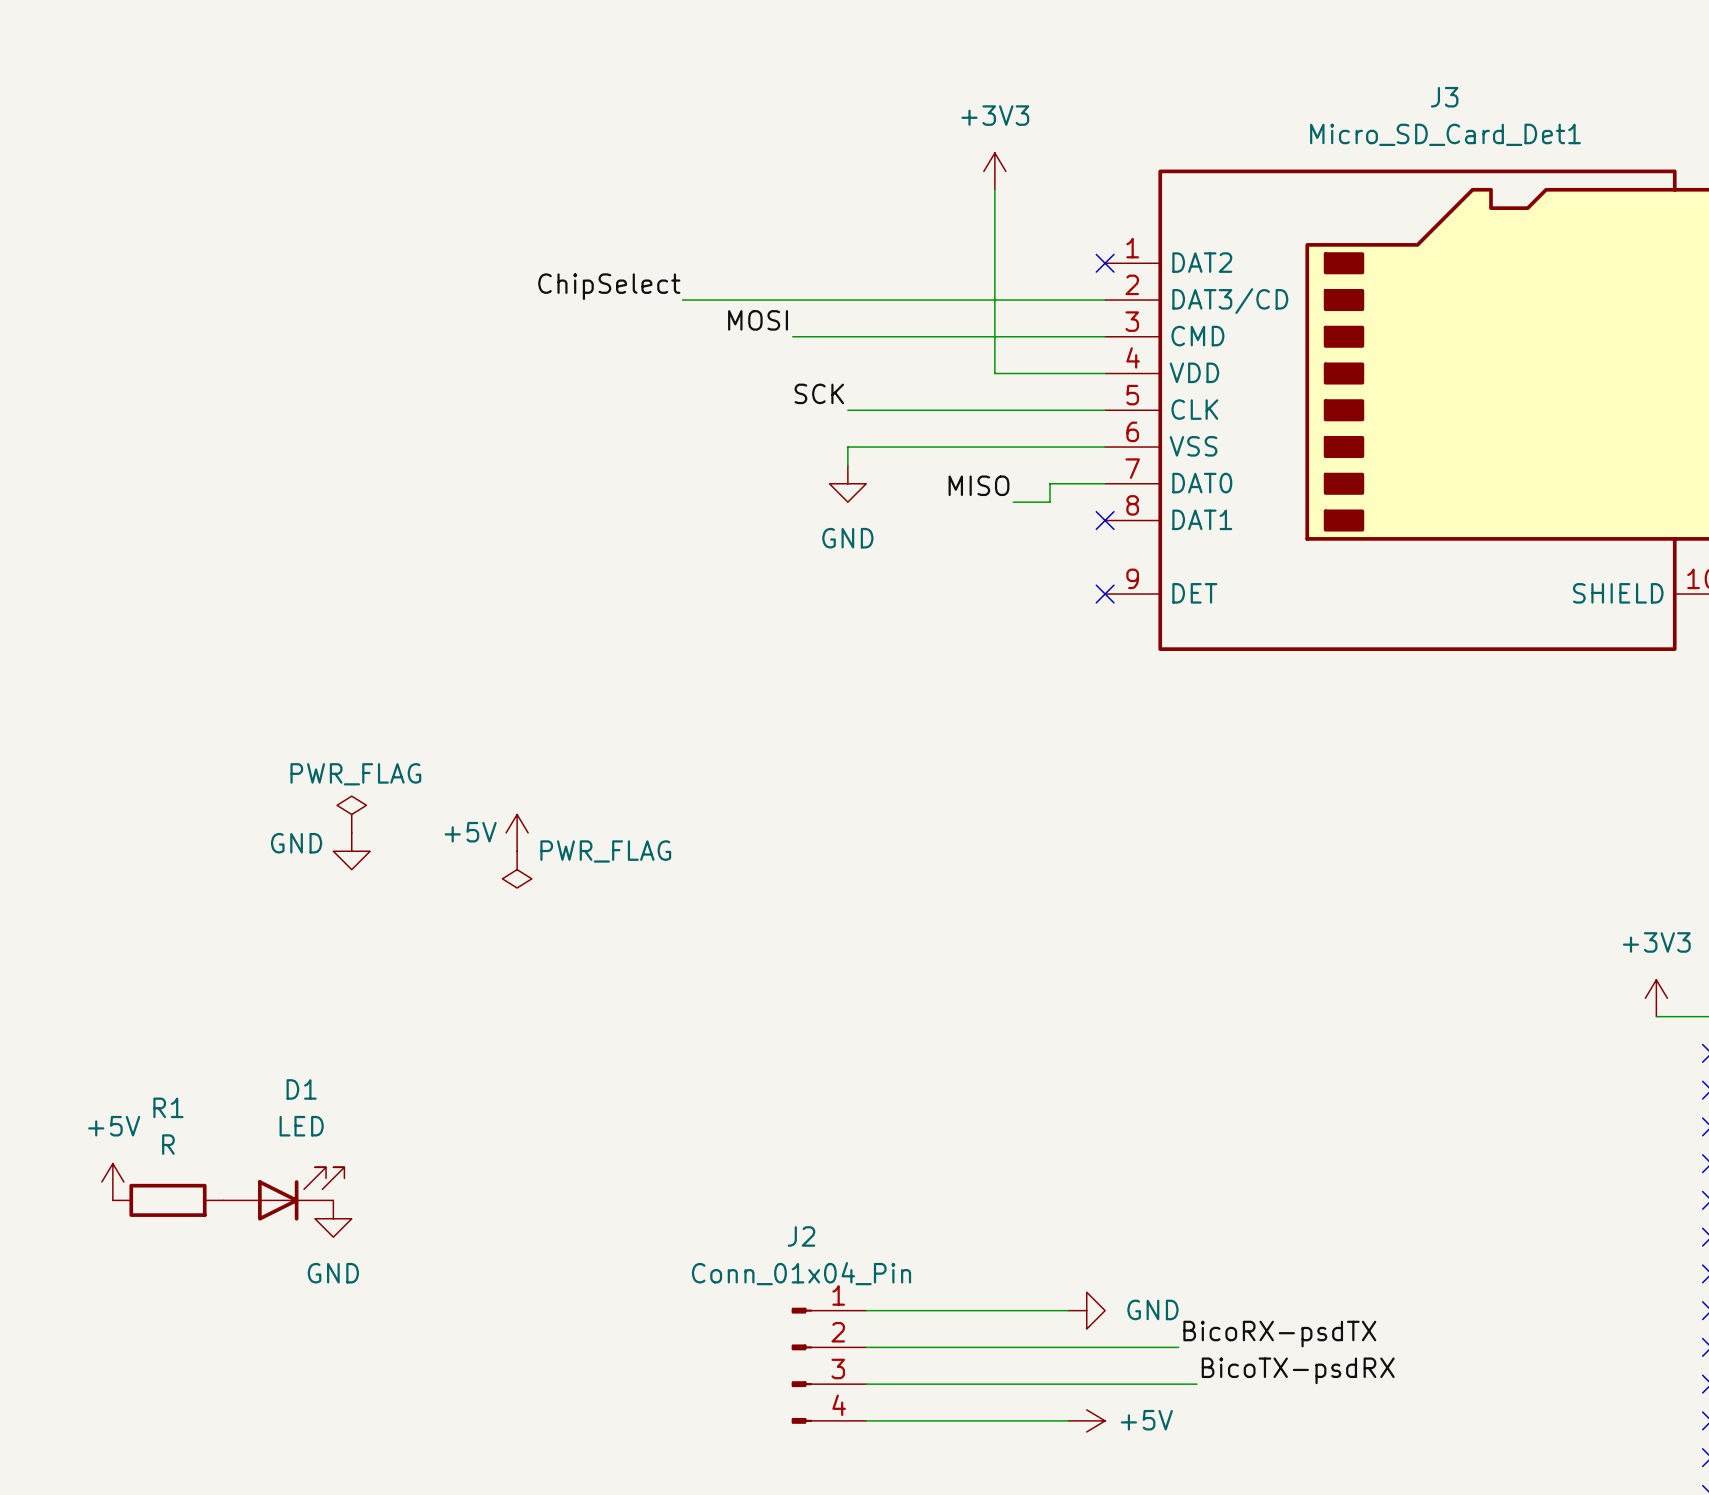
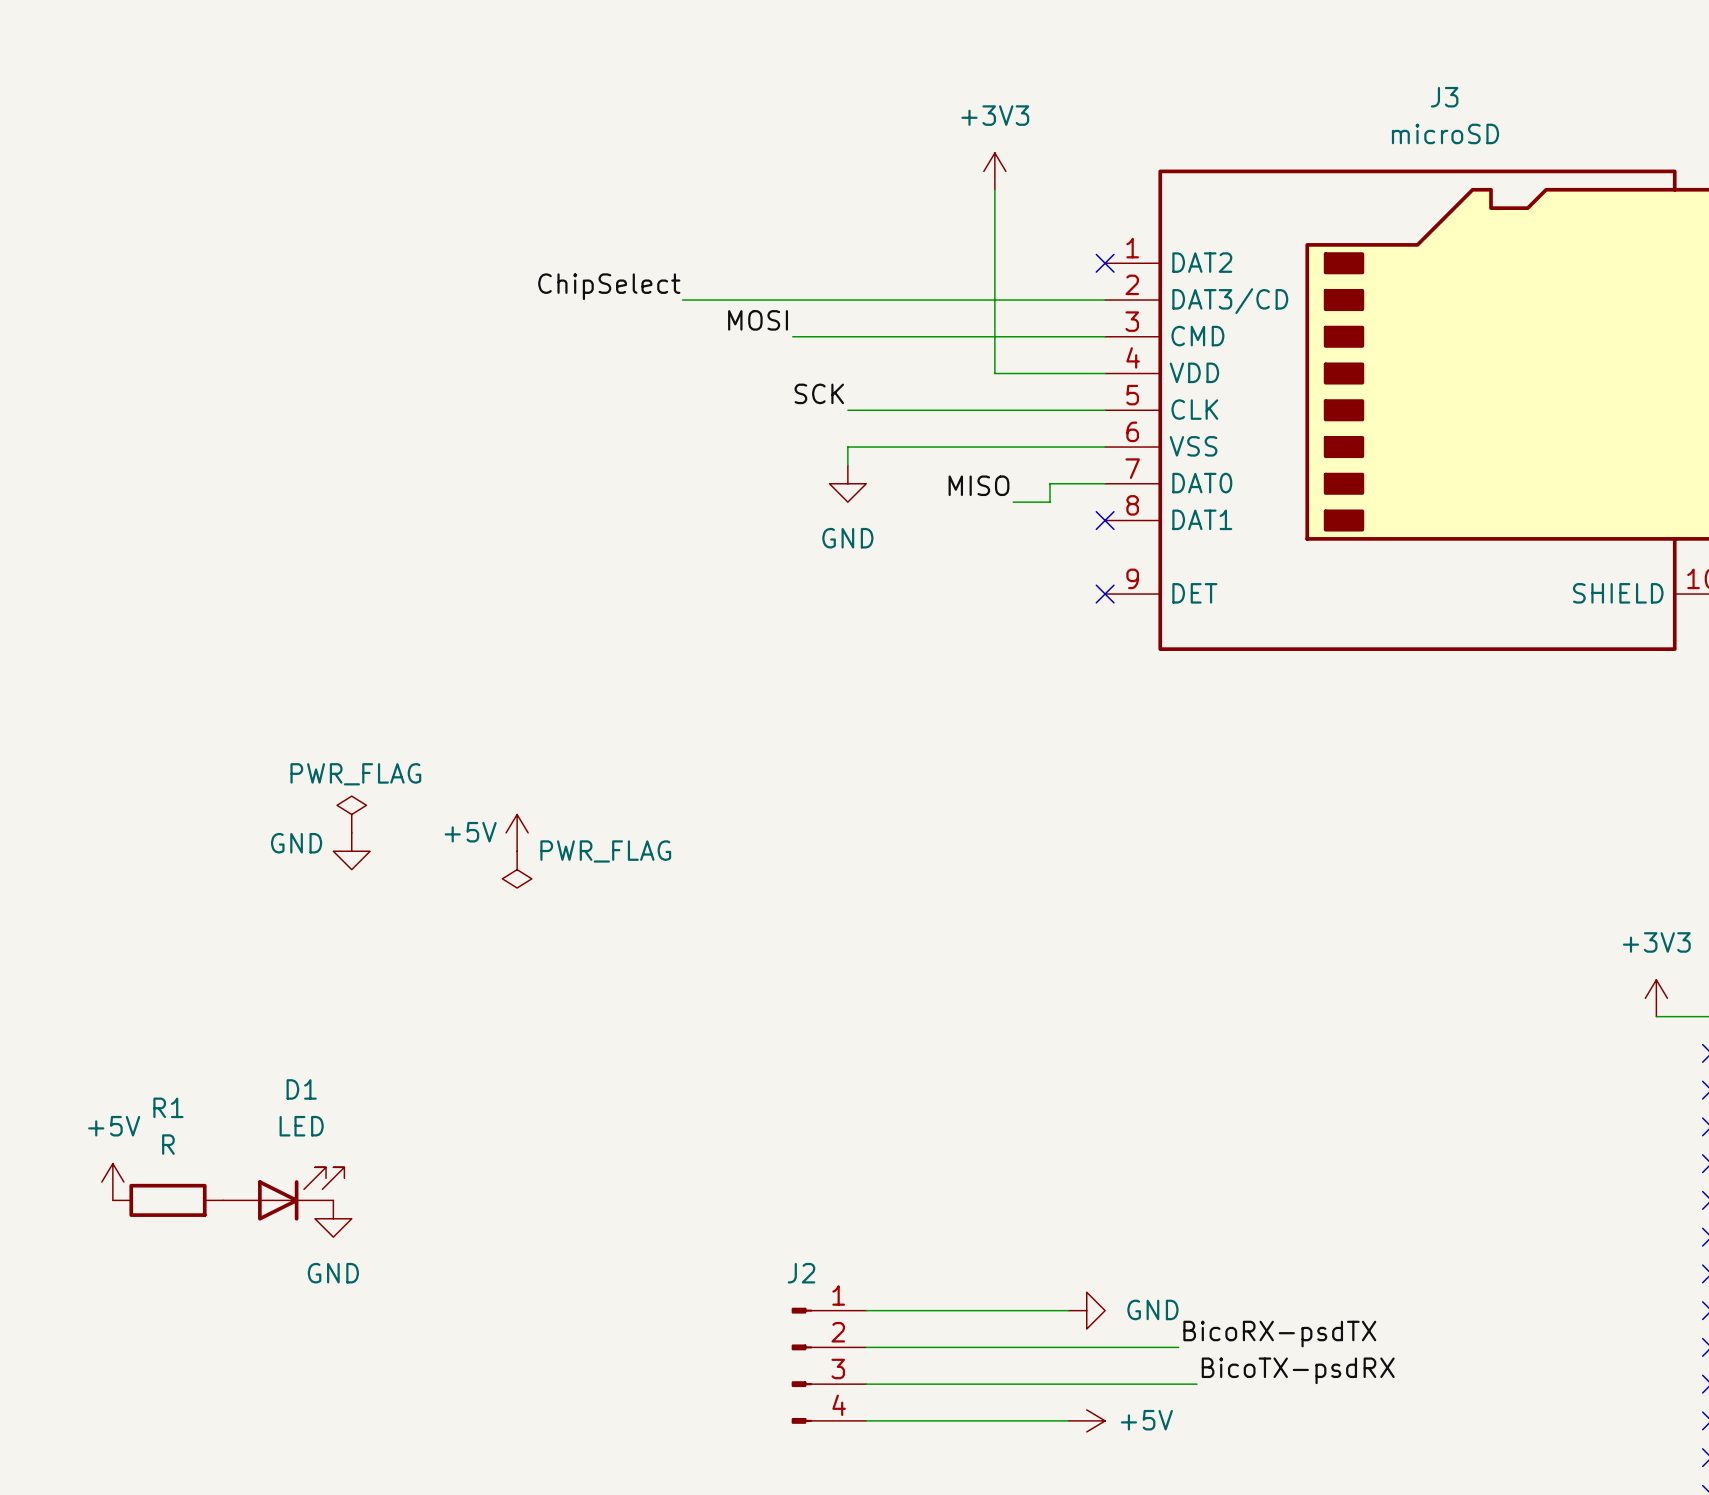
J3 value: Micro_SD_Card_Det1 (1445, 134) -> microSD (1445, 133)
J2 name position: J2 (801, 1236) -> J2 (801, 1273)
J2 value: Conn_01x04_Pin (801, 1273) -> none

